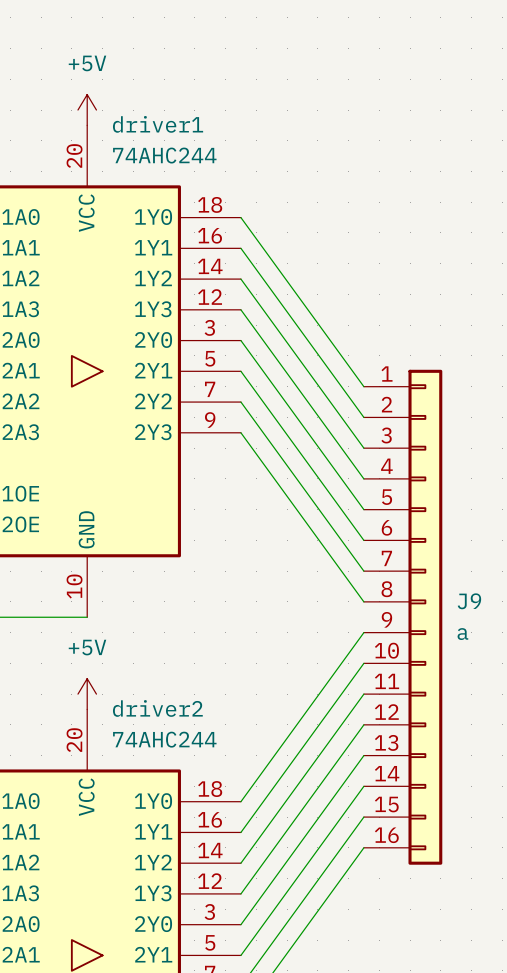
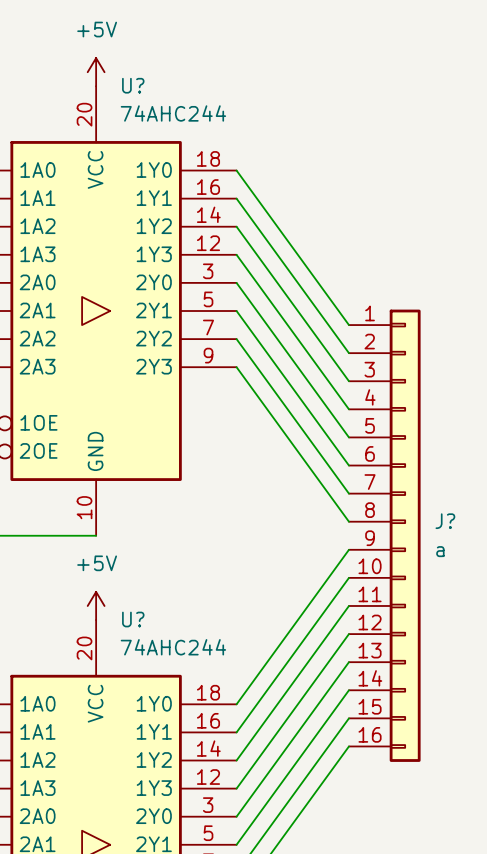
driver1 name: driver1 (158, 124) -> U? (133, 85)
J9 name: J9 (469, 601) -> J? (445, 521)
driver2 name: driver2 (157, 708) -> U? (133, 619)

